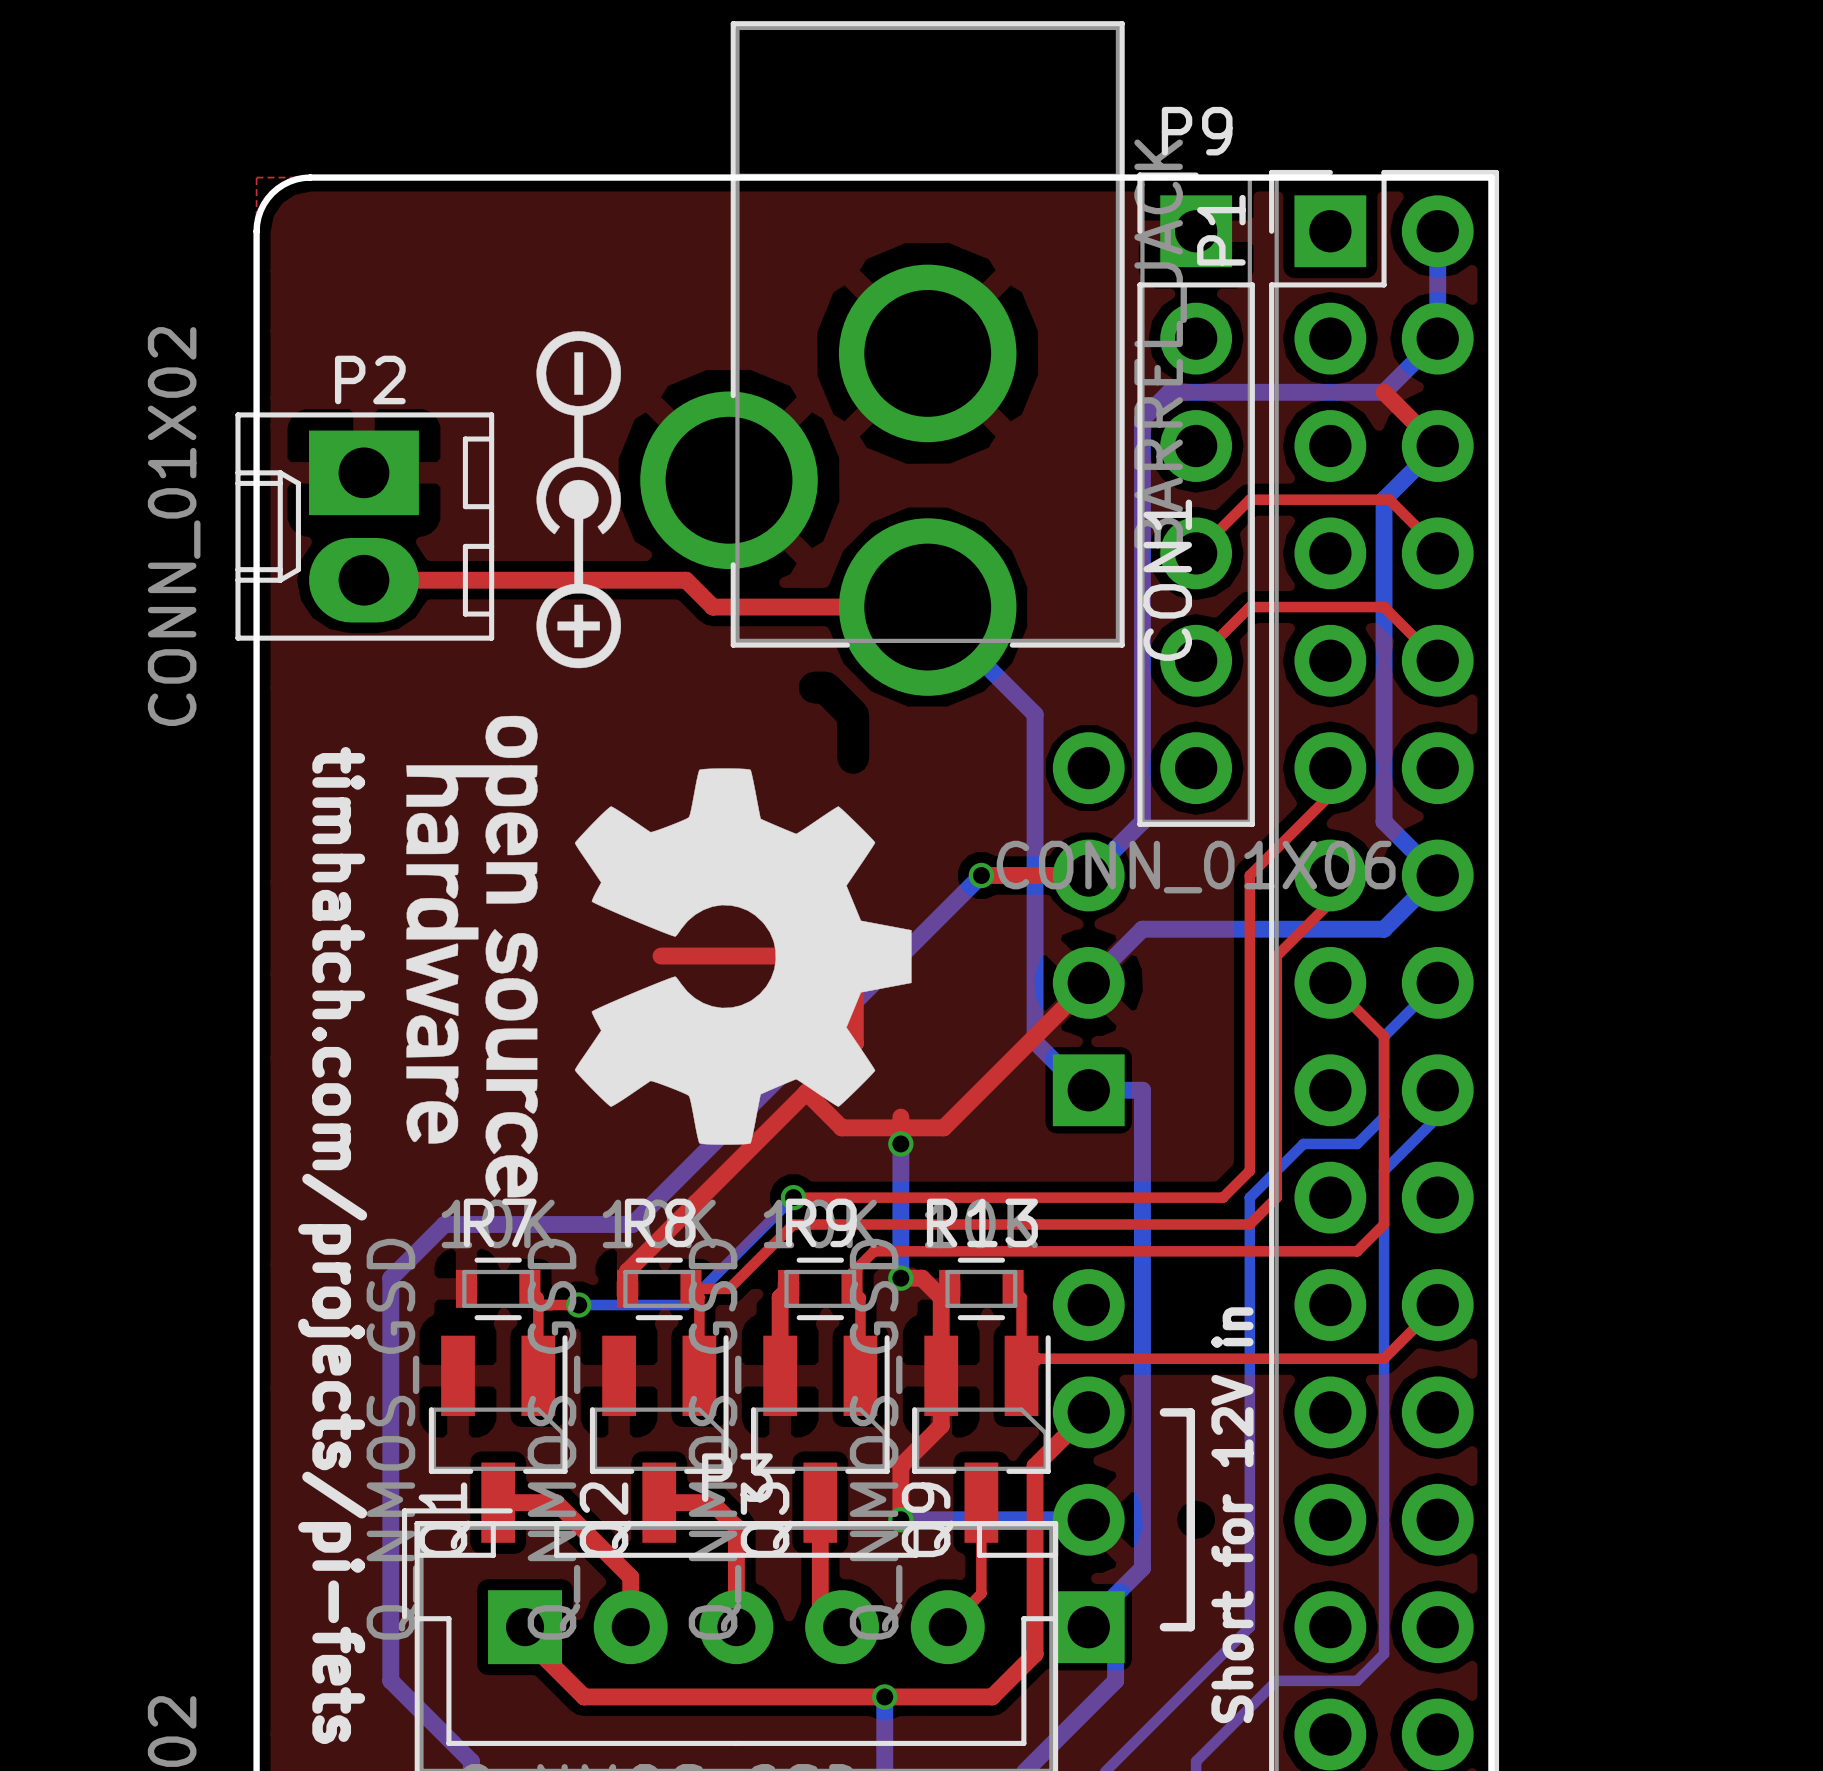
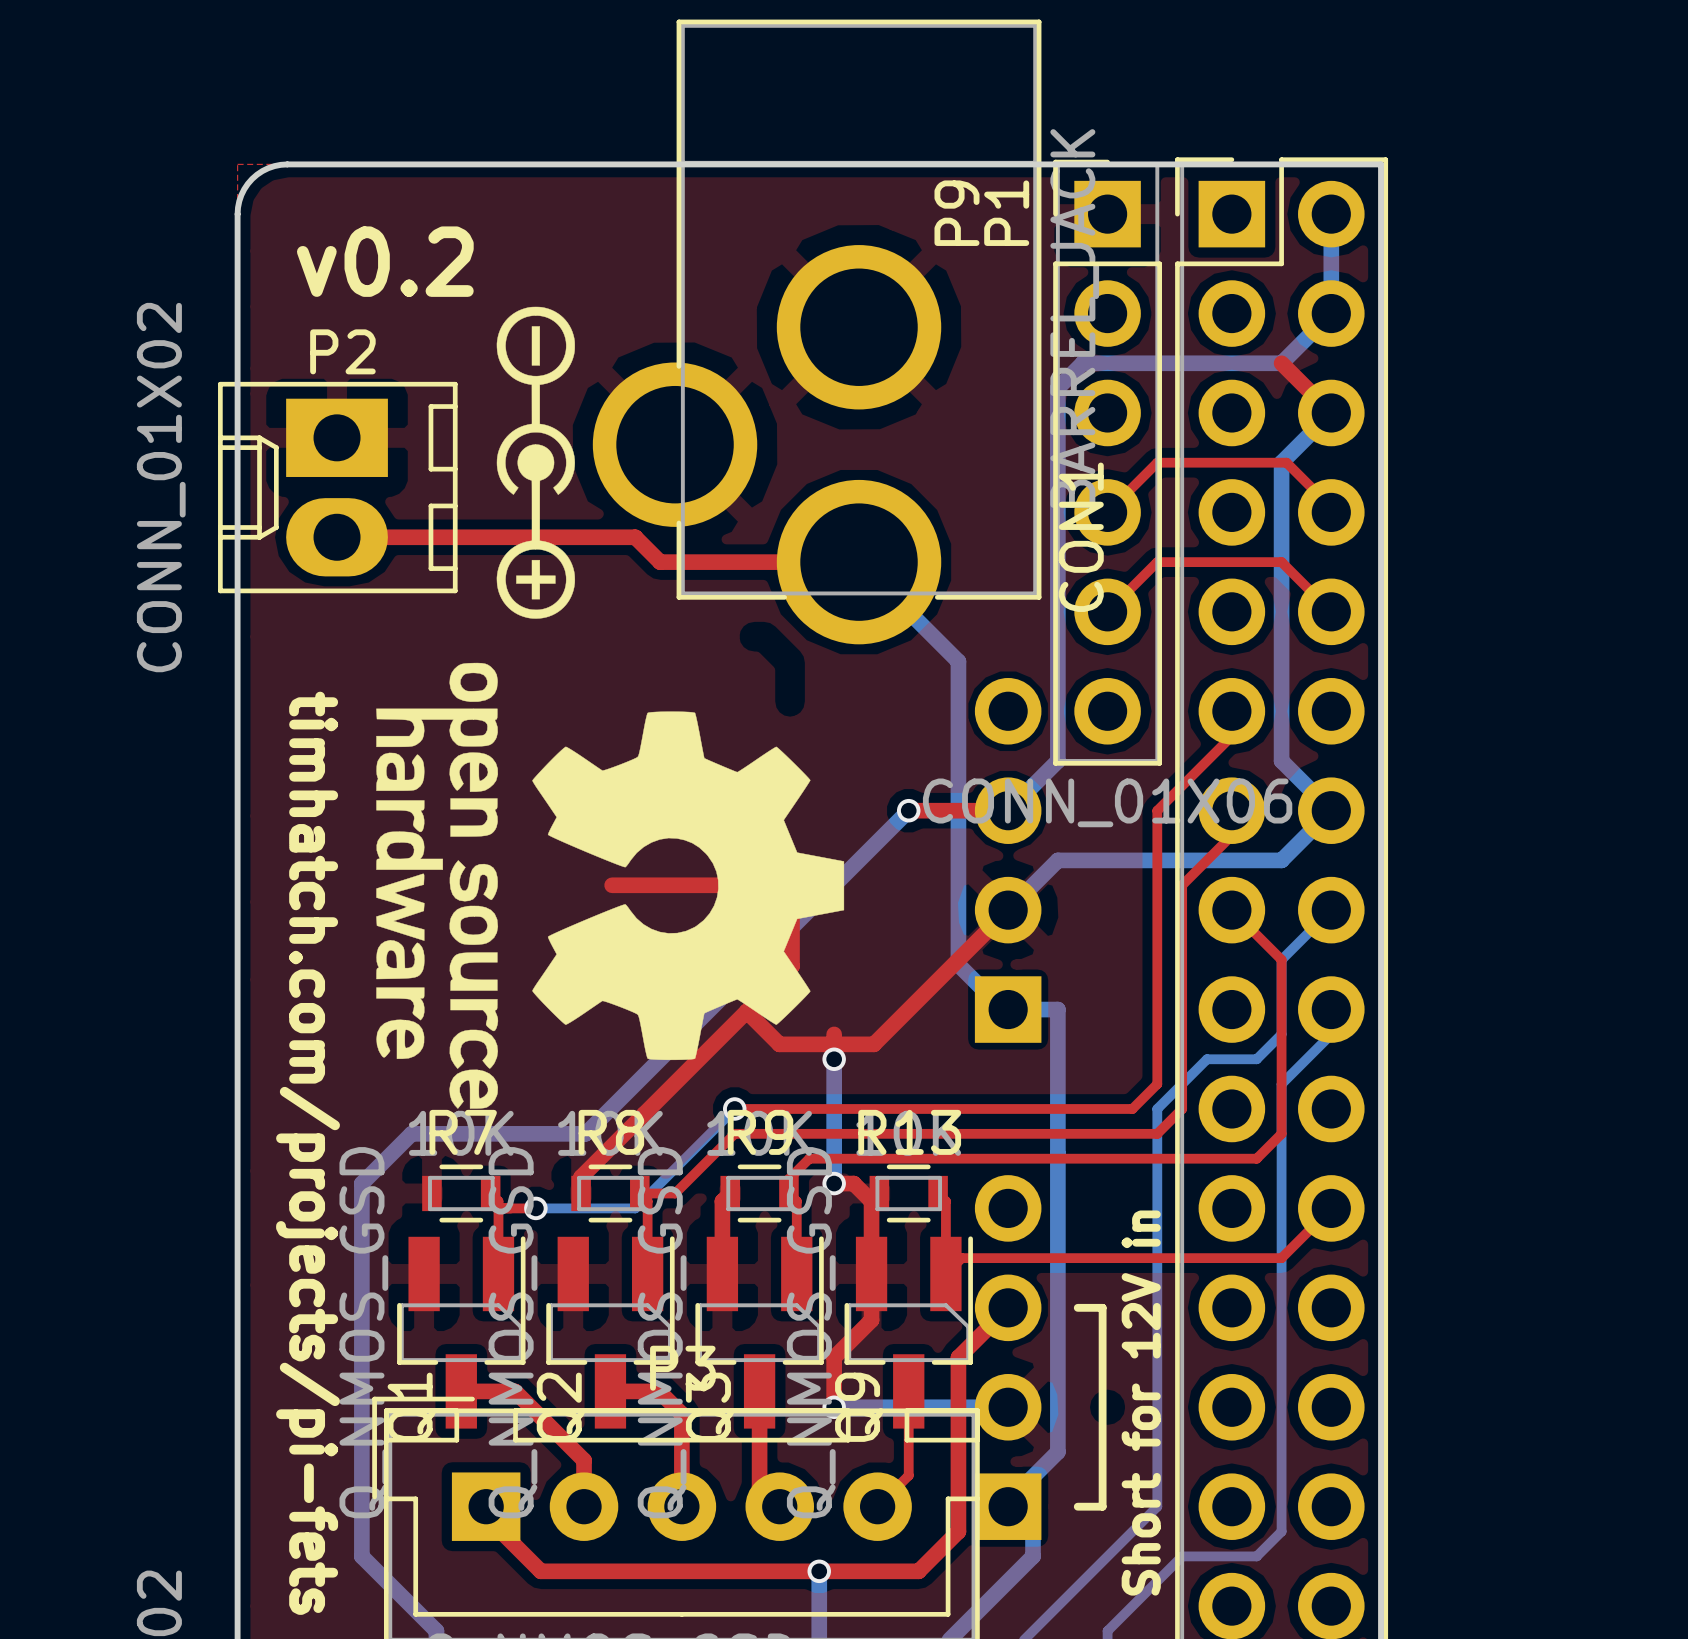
P9 name rotation: 0° (1197, 131) -> 90° counterclockwise (956, 213)
P9 name position: P9 (1197, 131) -> P9 (956, 213)
P1 name position: P1 (1221, 230) -> P1 (1006, 213)
text: none -> v0.2 (385, 261)

